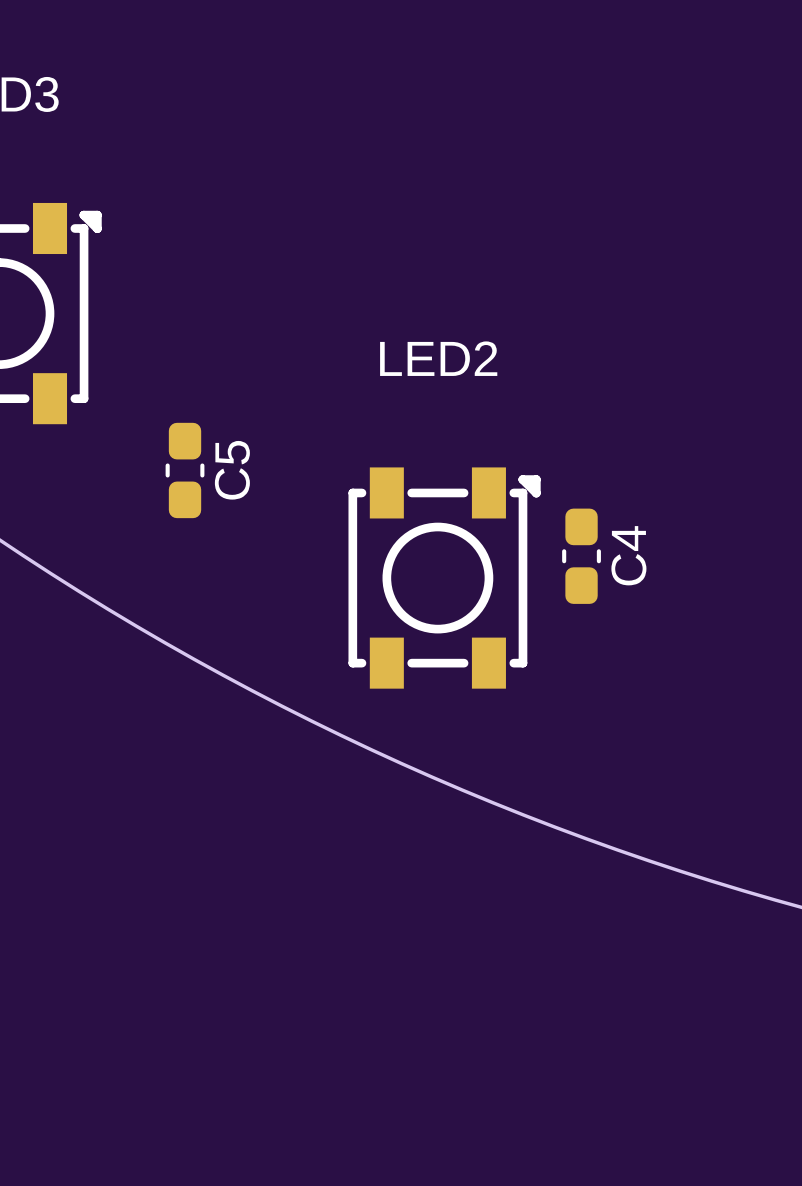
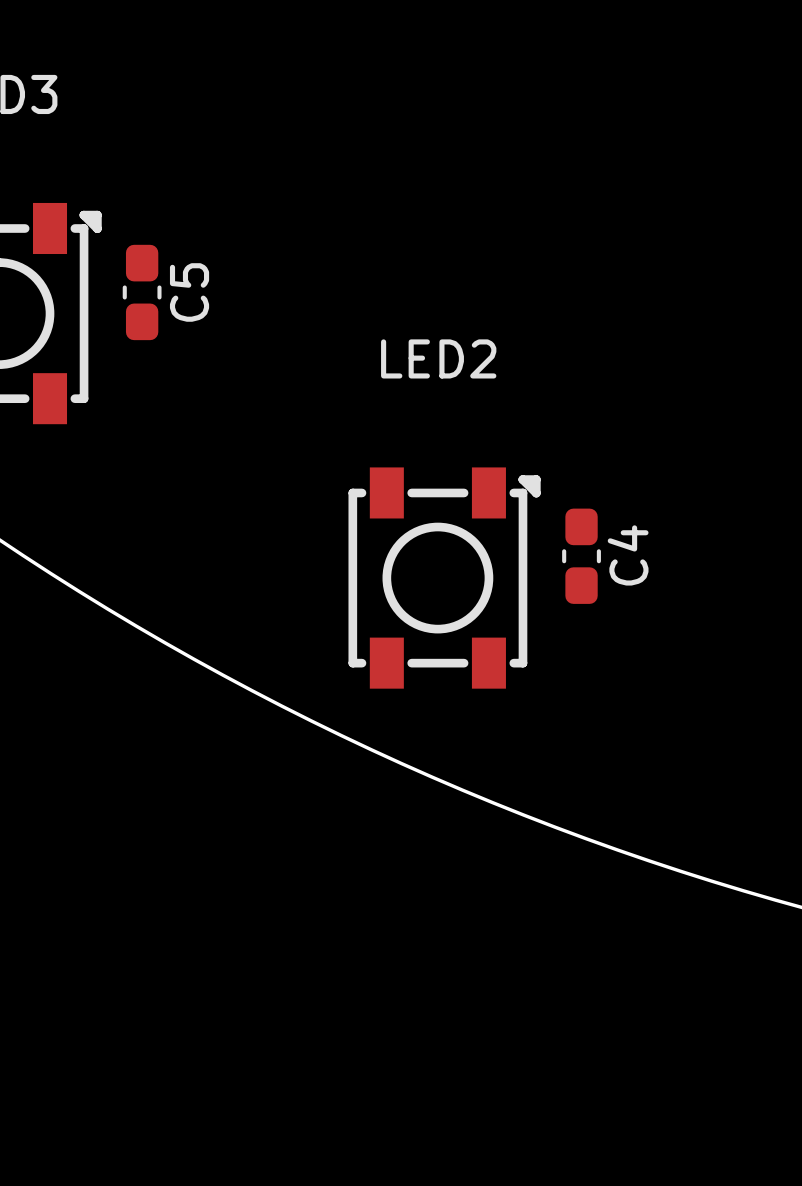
C5 position: (185, 470) -> (142, 292)

